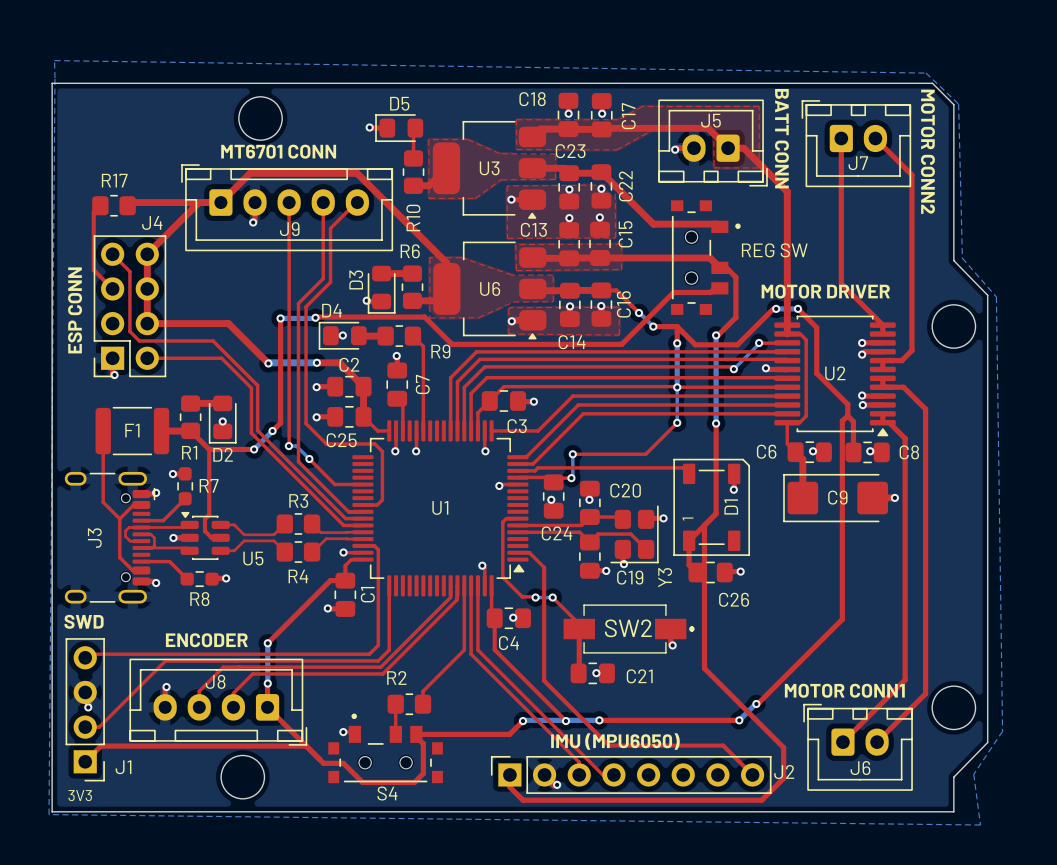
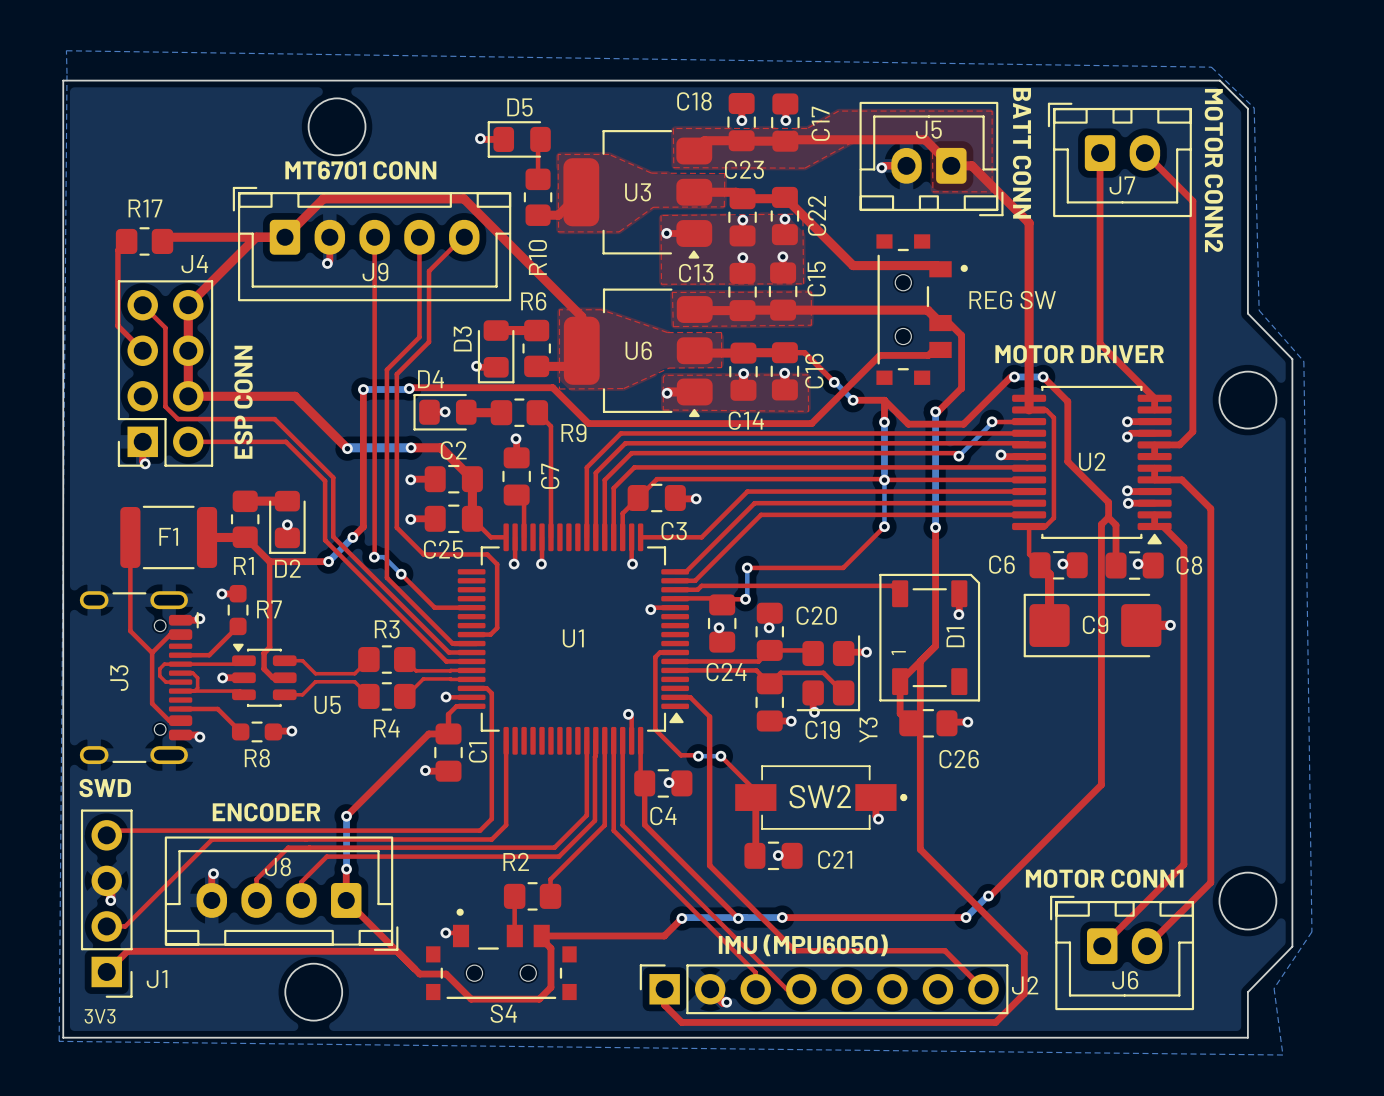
text position: ESP CONN (75, 310) -> ESP CONN (243, 402)
top track: (450, 597) (380, 667) -> (586, 755) (586, 815) (554, 847) (495, 847)
top track: (456, 599) (382, 673) -> (594, 759) (594, 820) (559, 856) (497, 856)

